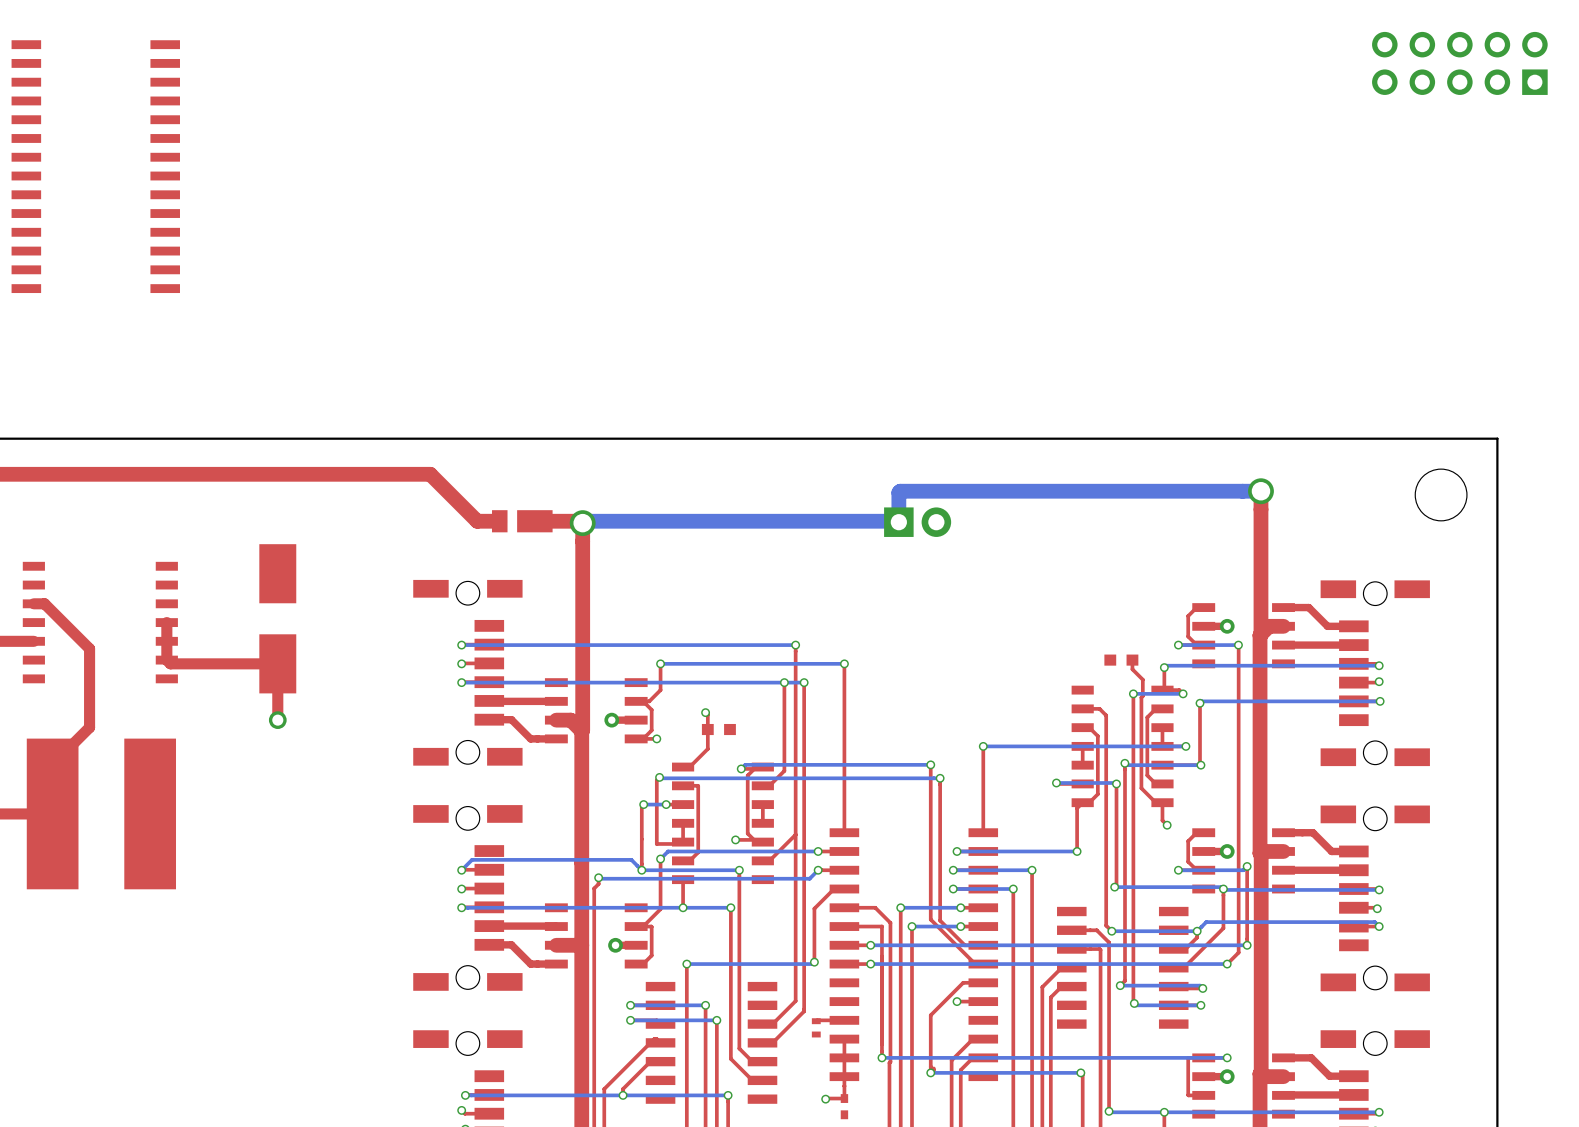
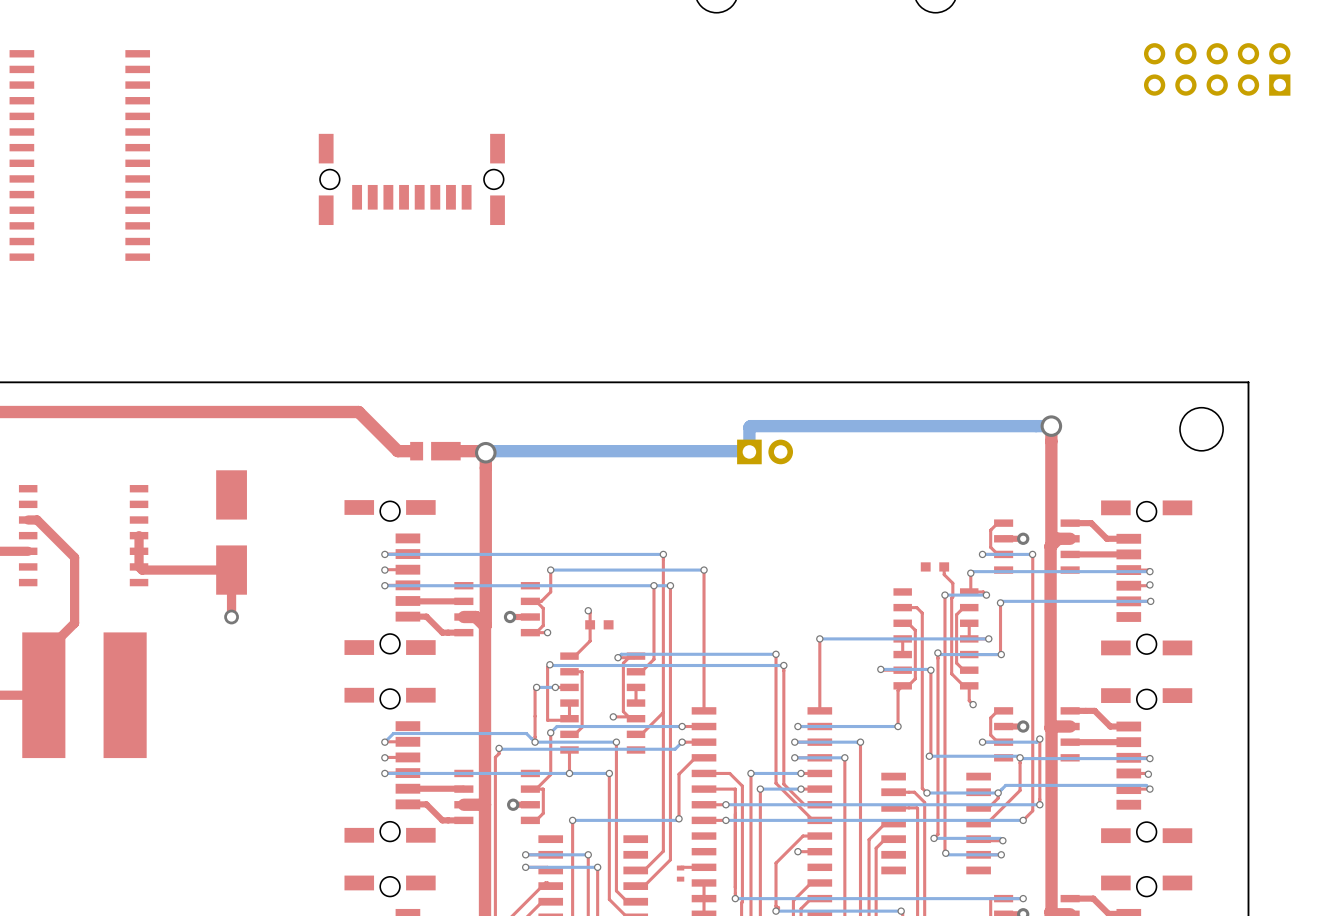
part: none -> (411, 179)

